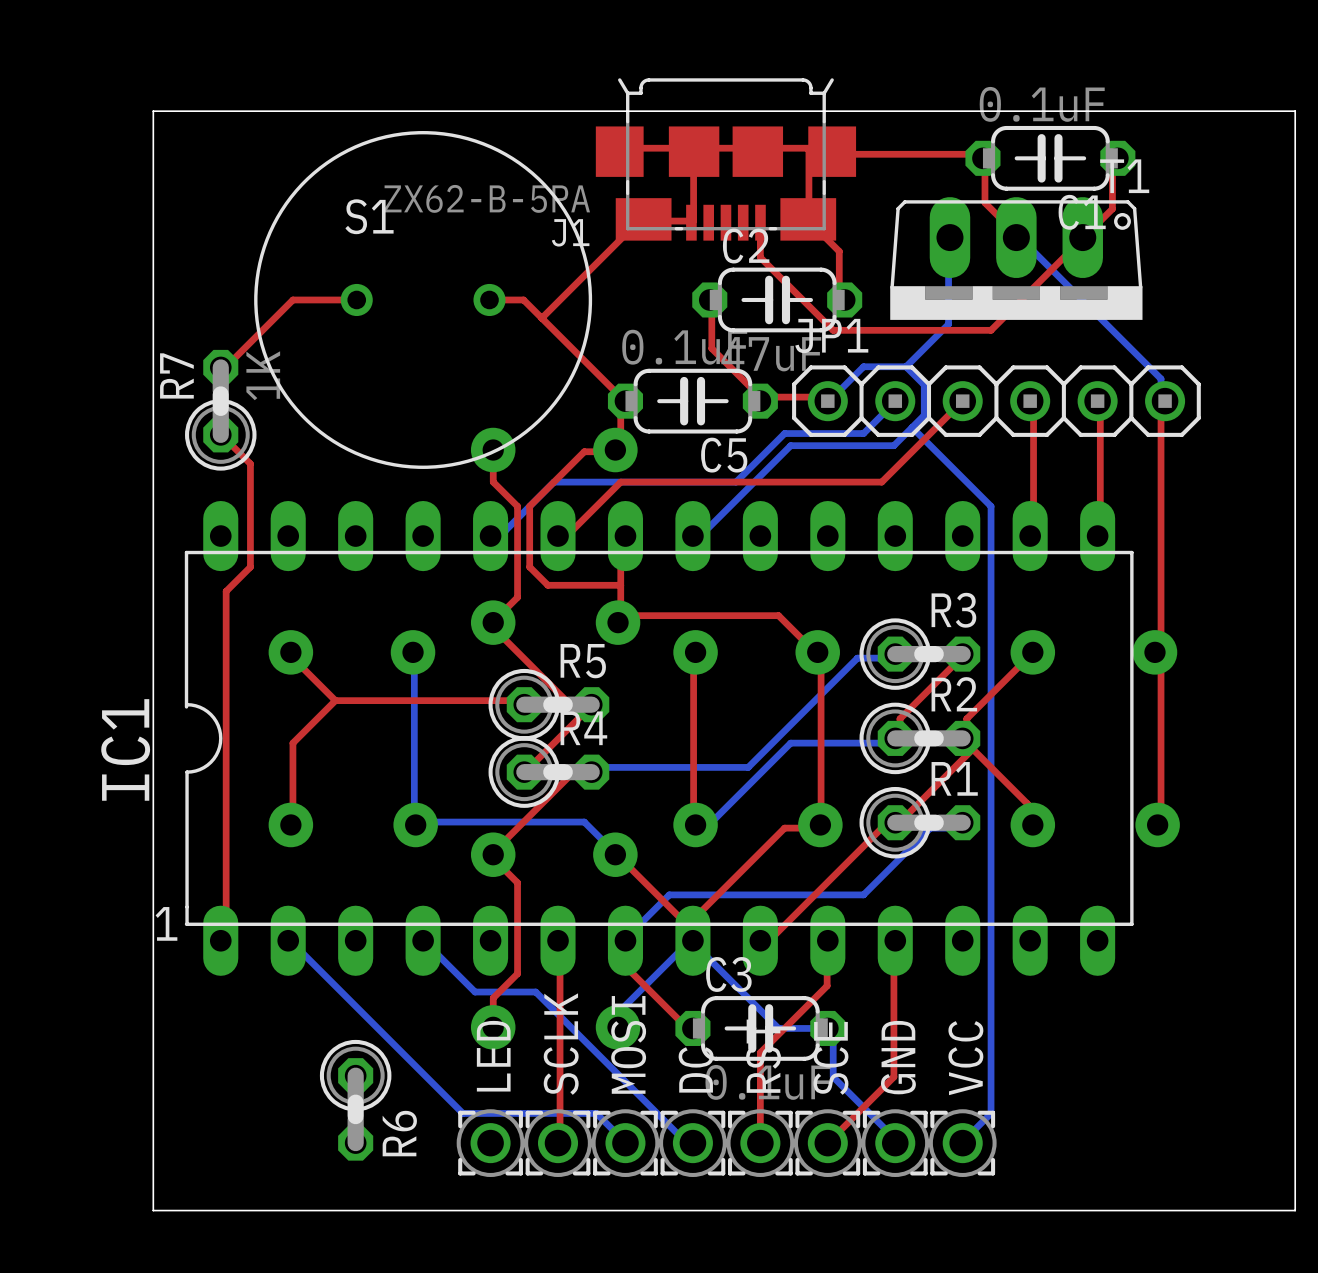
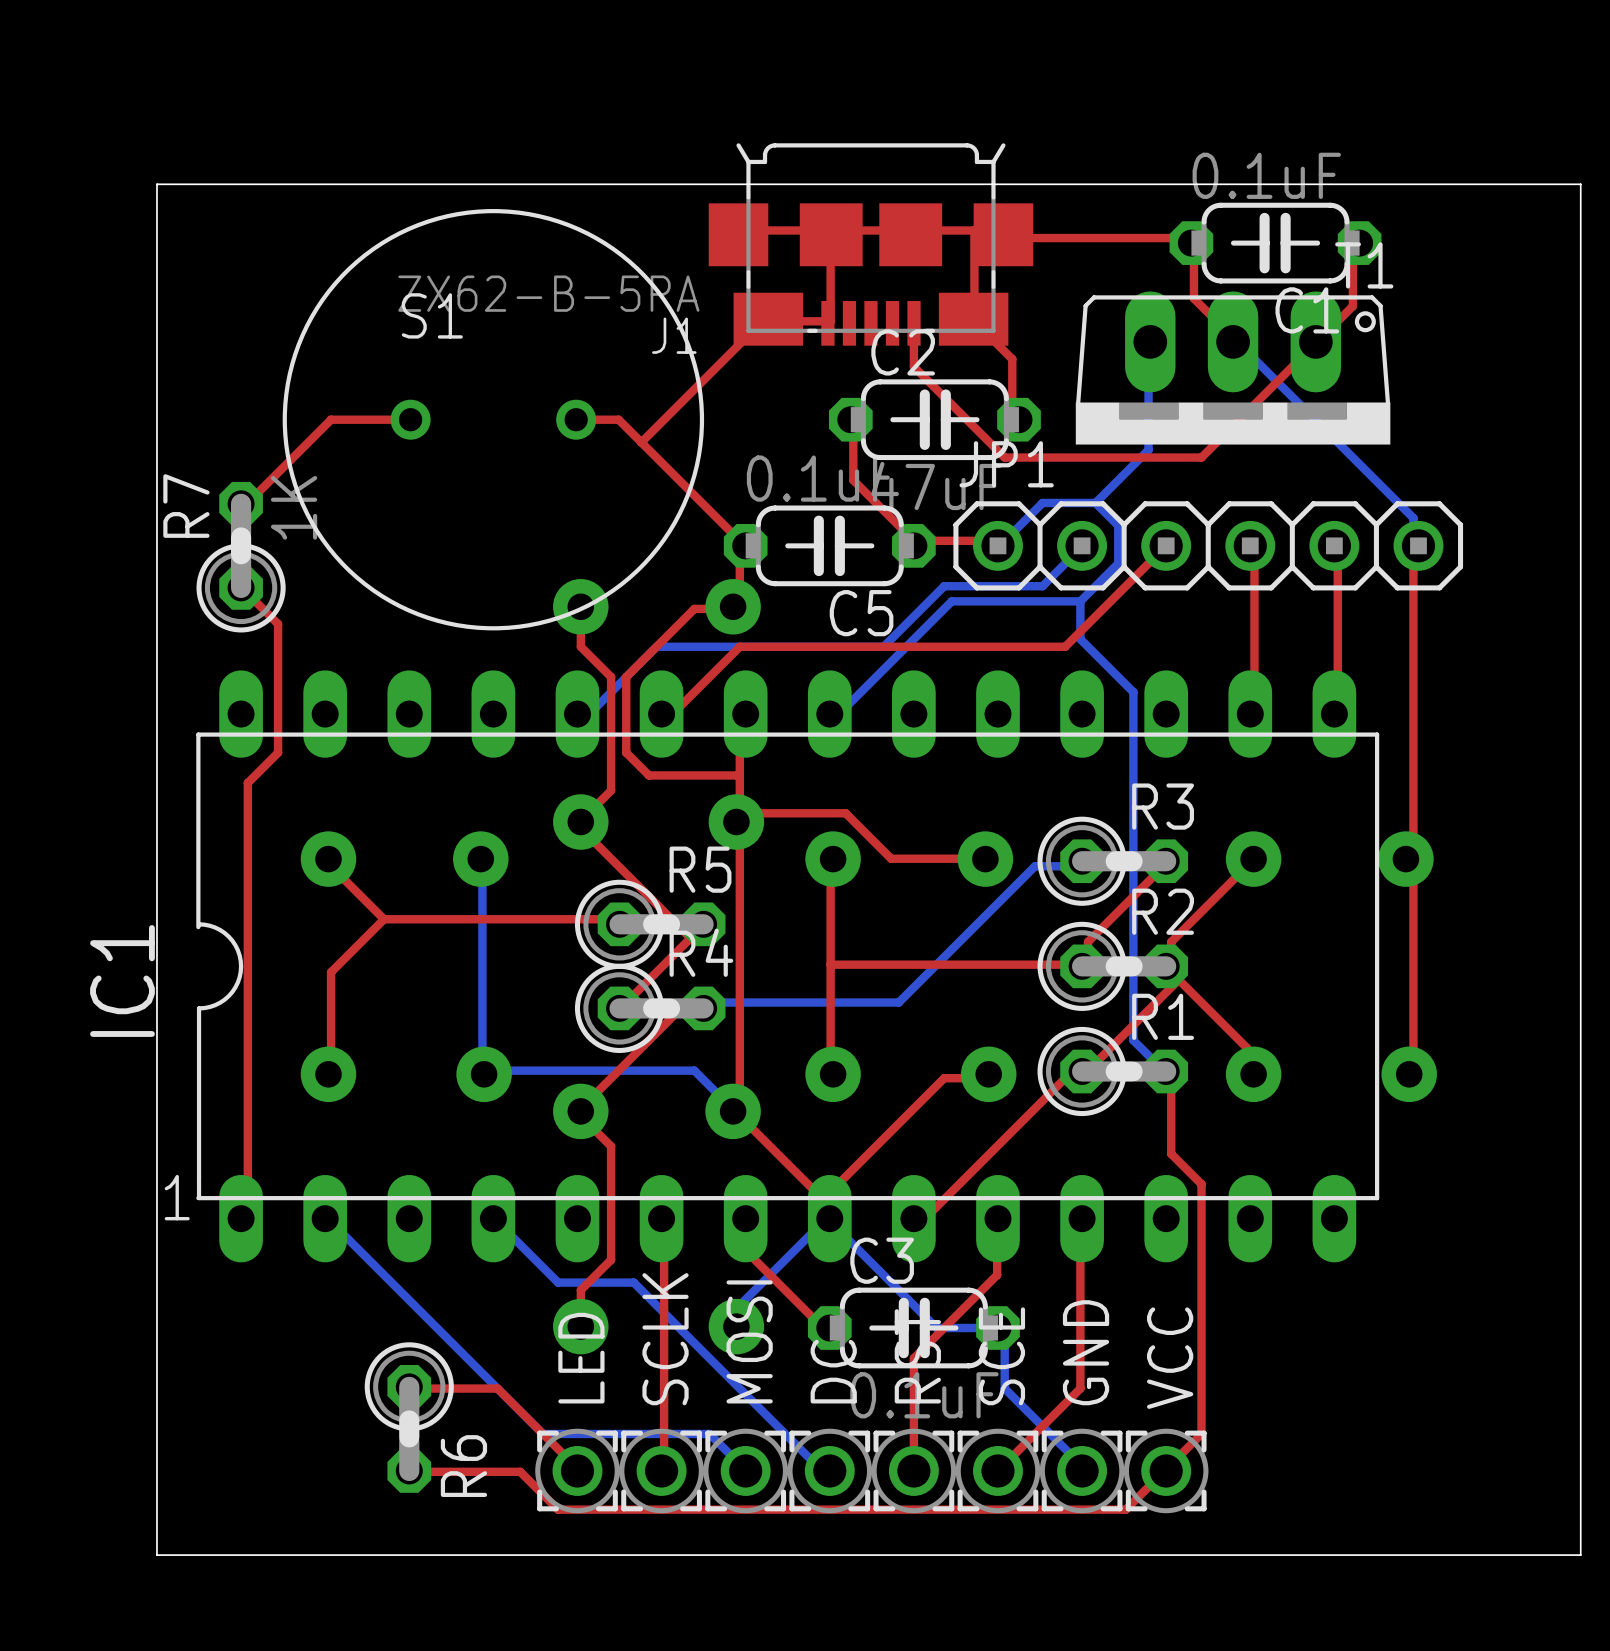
bottom track: (912, 427) (991, 506) (991, 1113) (962, 1143) -> none
bottom track: none -> (1080, 601) (1080, 639) (1133, 692) (1133, 1040) (1166, 1071)
top track: (705, 615) (778, 615) (815, 652) -> (845, 813) (891, 858) (982, 858)
top track: none -> (736, 822) (739, 828) (739, 1108) (733, 1111)
top track: (817, 652) (821, 658) (820, 824) -> none
top track: none -> (830, 964) (1080, 964) (1082, 966)
bottom track: (895, 738) (893, 743) (790, 743) (711, 822) (699, 822) (695, 824) -> none
top track: none -> (1166, 1071) (1171, 1078) (1171, 1153) (1201, 1184) (1201, 1433) (1125, 1509) (558, 1509) (520, 1471) (409, 1470)
bottom track: (960, 828) (930, 828) (863, 894) (669, 894) (625, 940) -> none
top track: none -> (409, 1386) (414, 1388) (497, 1388) (573, 1464) (577, 1470)

